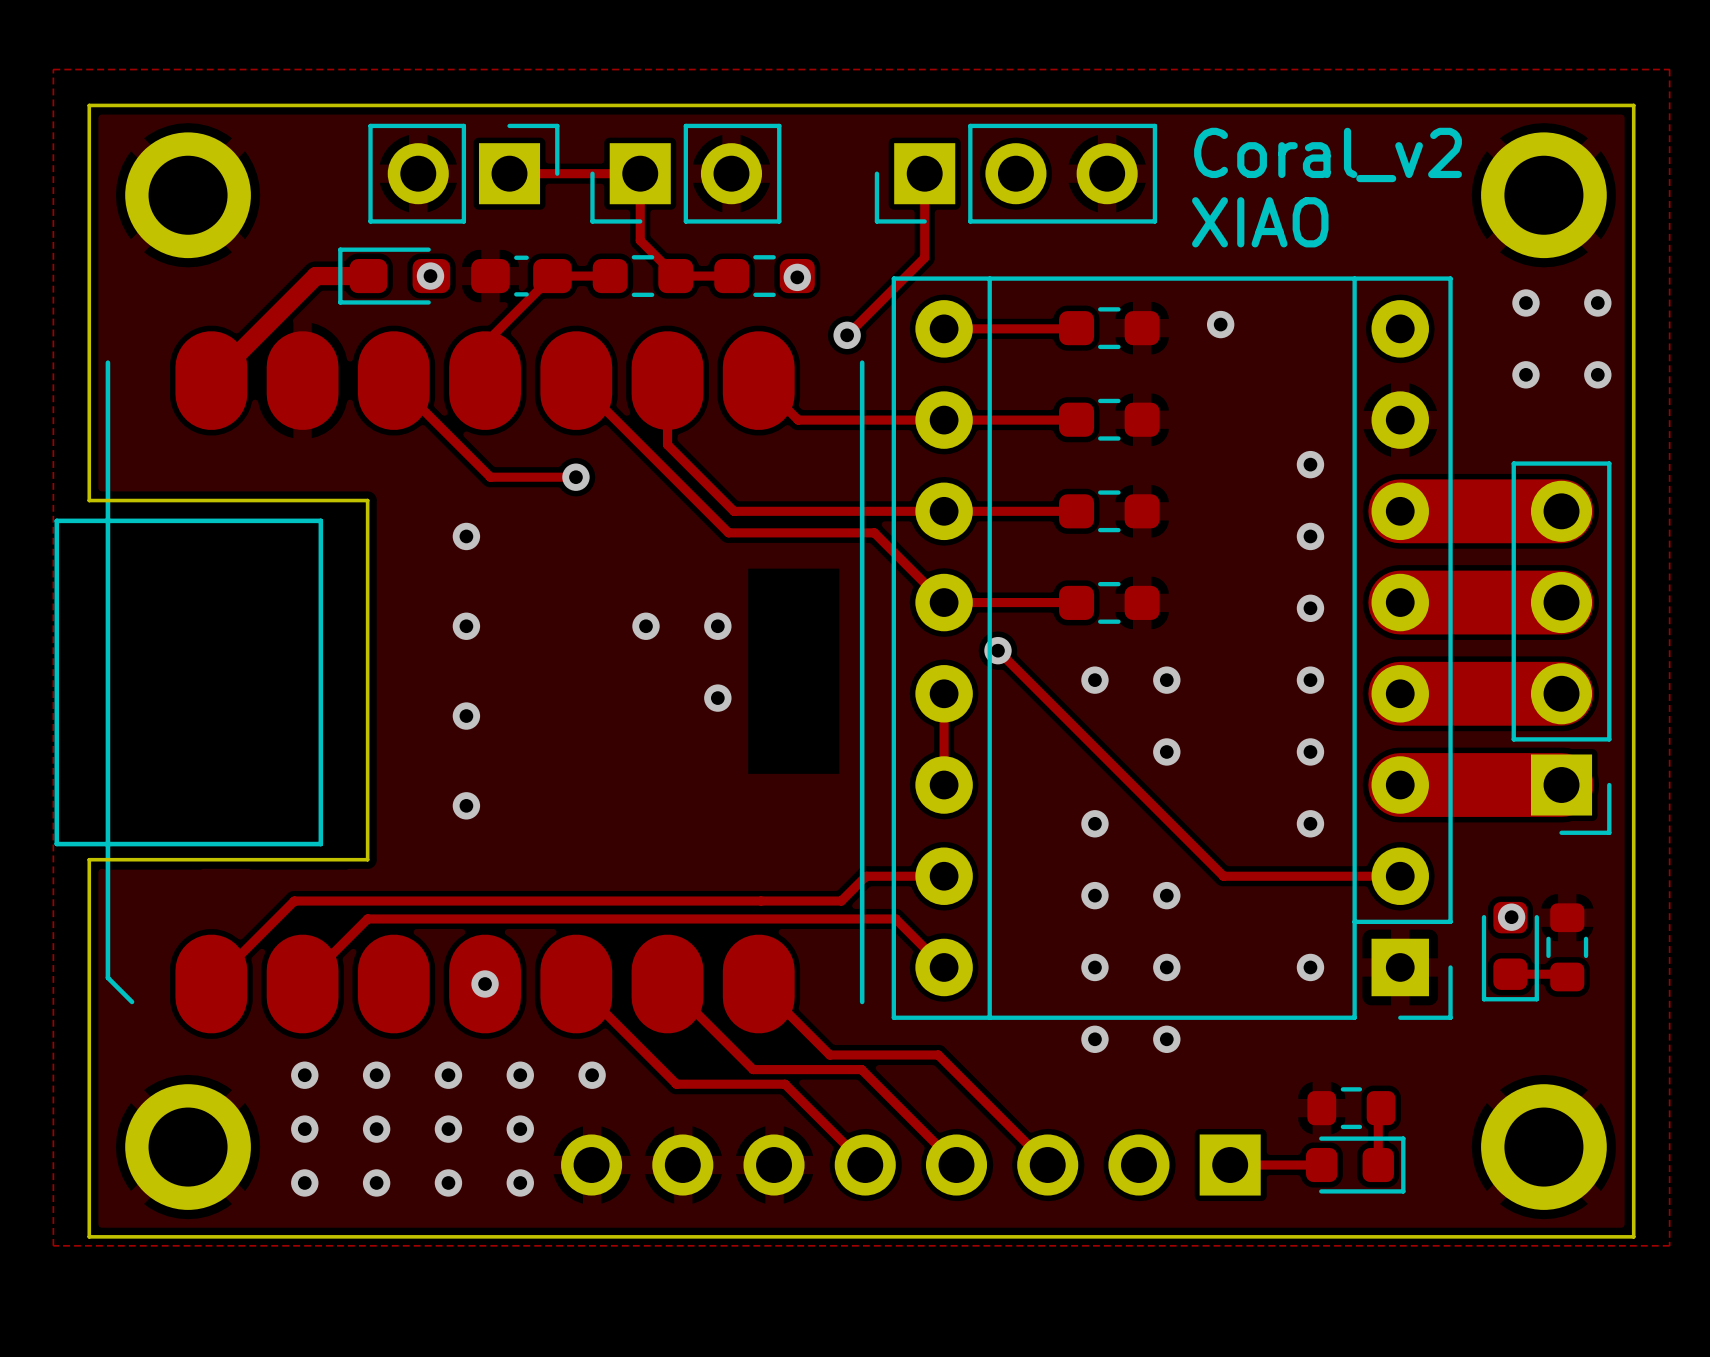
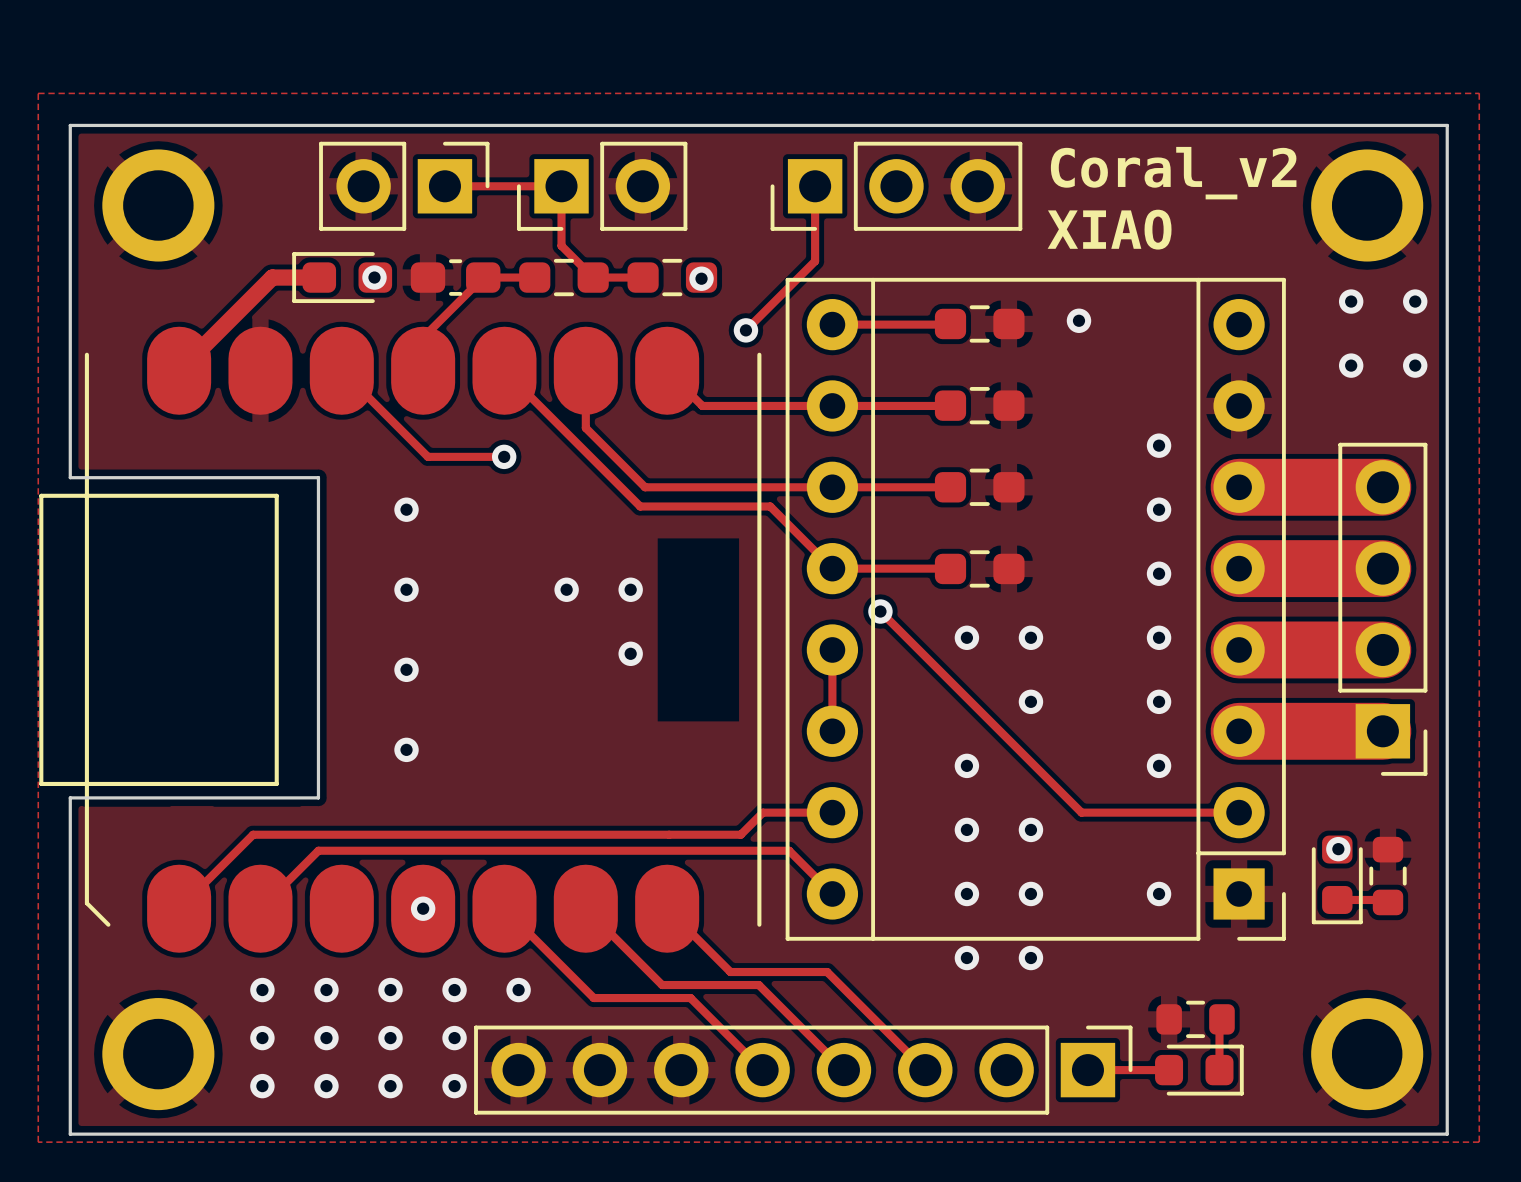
part side: bottom (910, 1165) -> top (803, 1070)

